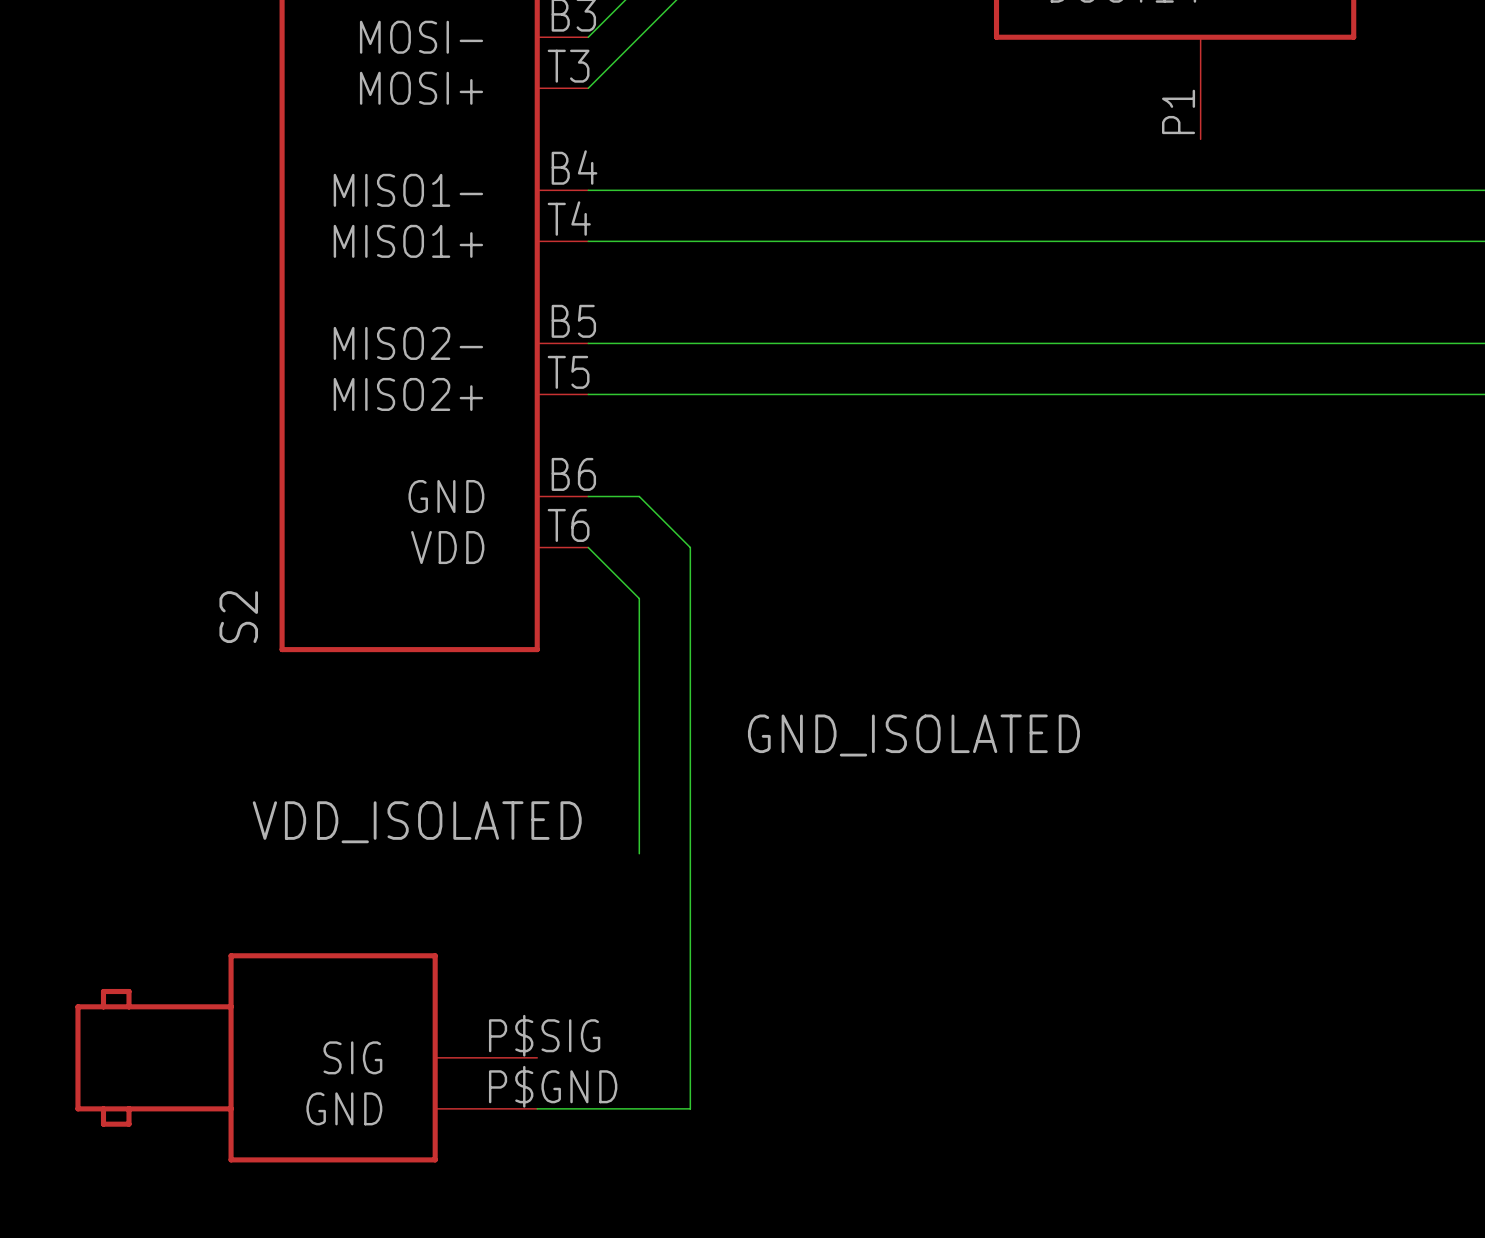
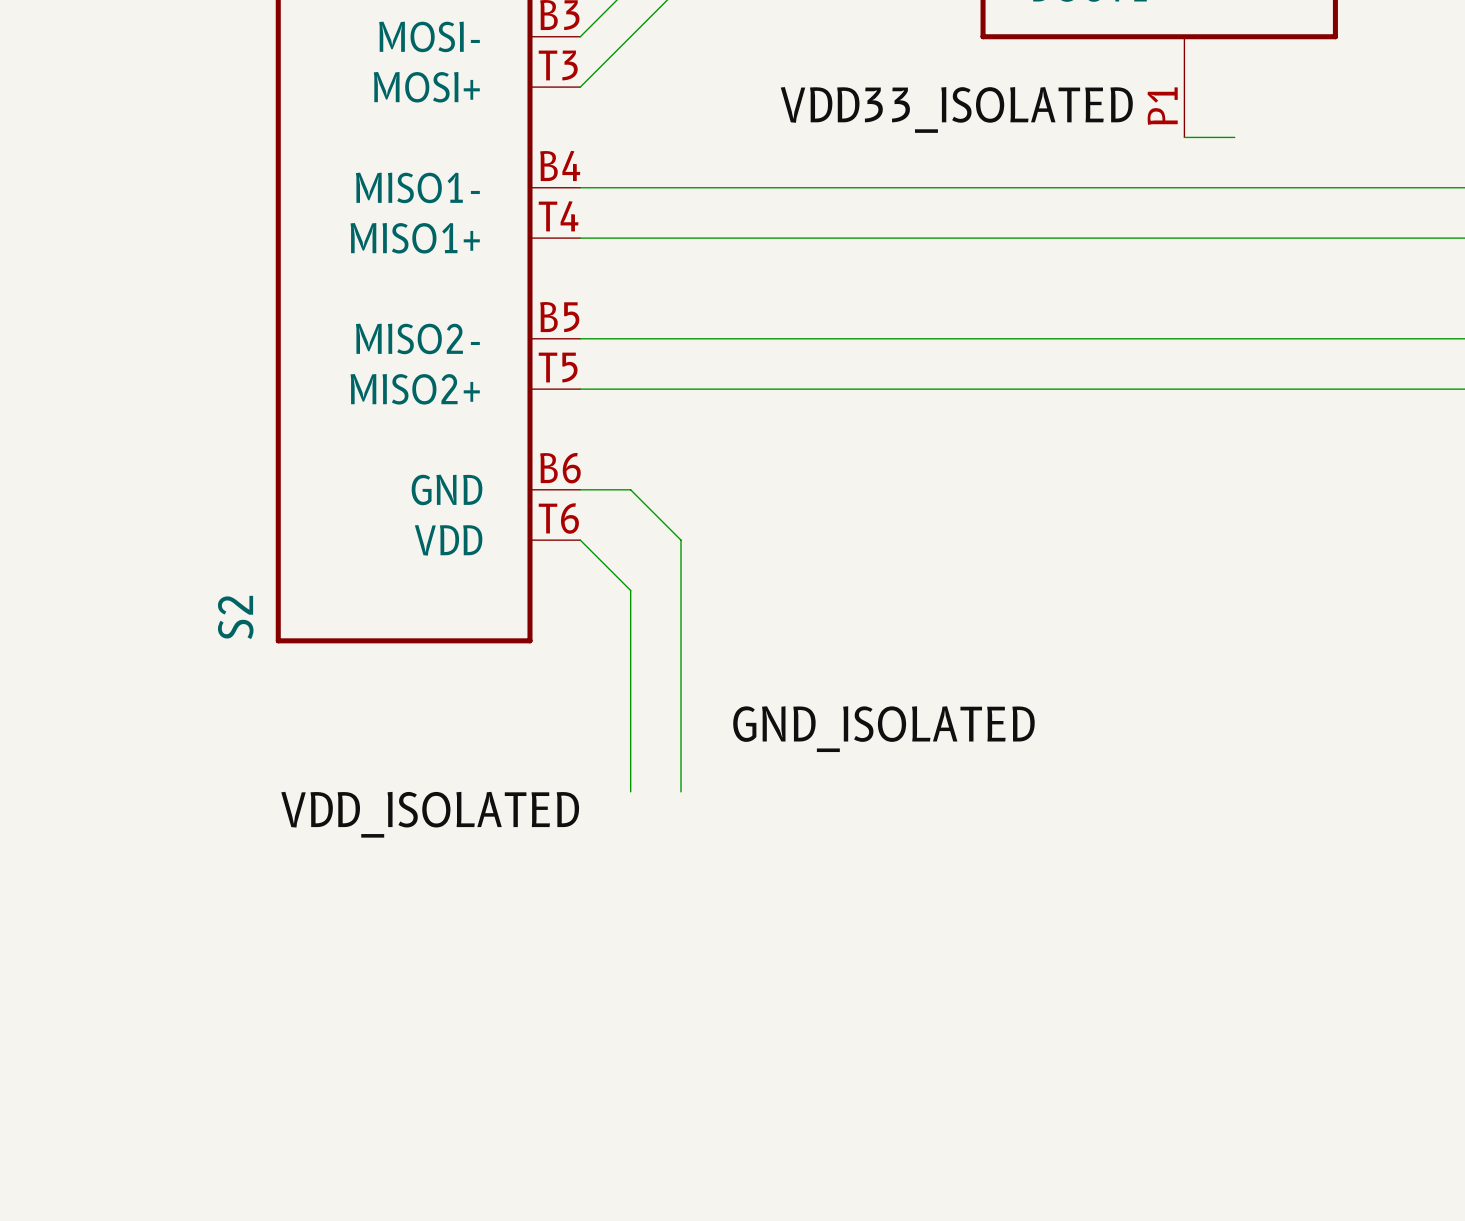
label: none -> VDD33_ISOLATED (956, 109)
wire: none -> (1184, 137) (1234, 137)
wire: (639, 802) (639, 853) -> none
wire: (690, 802) (690, 1108) (537, 1108) -> none
part: (306, 1057) -> none

